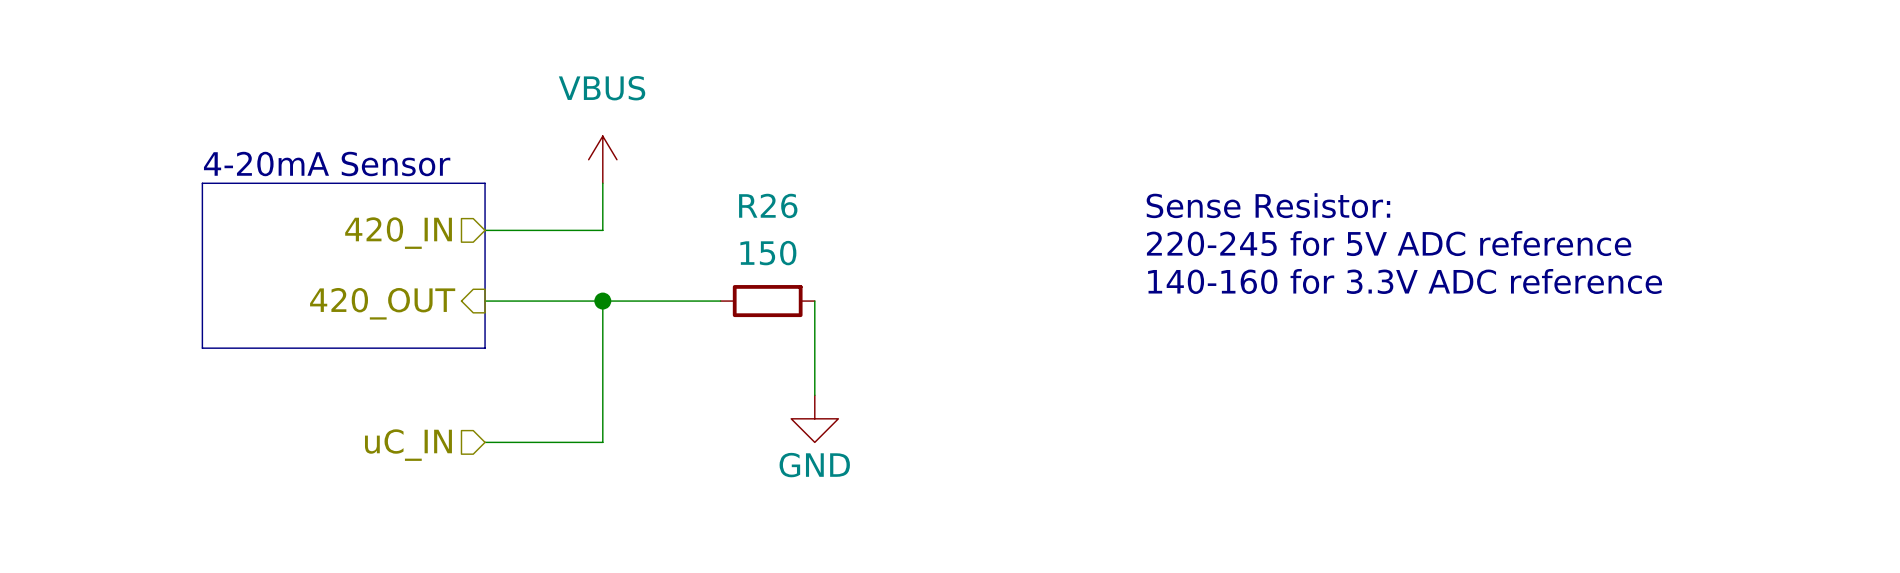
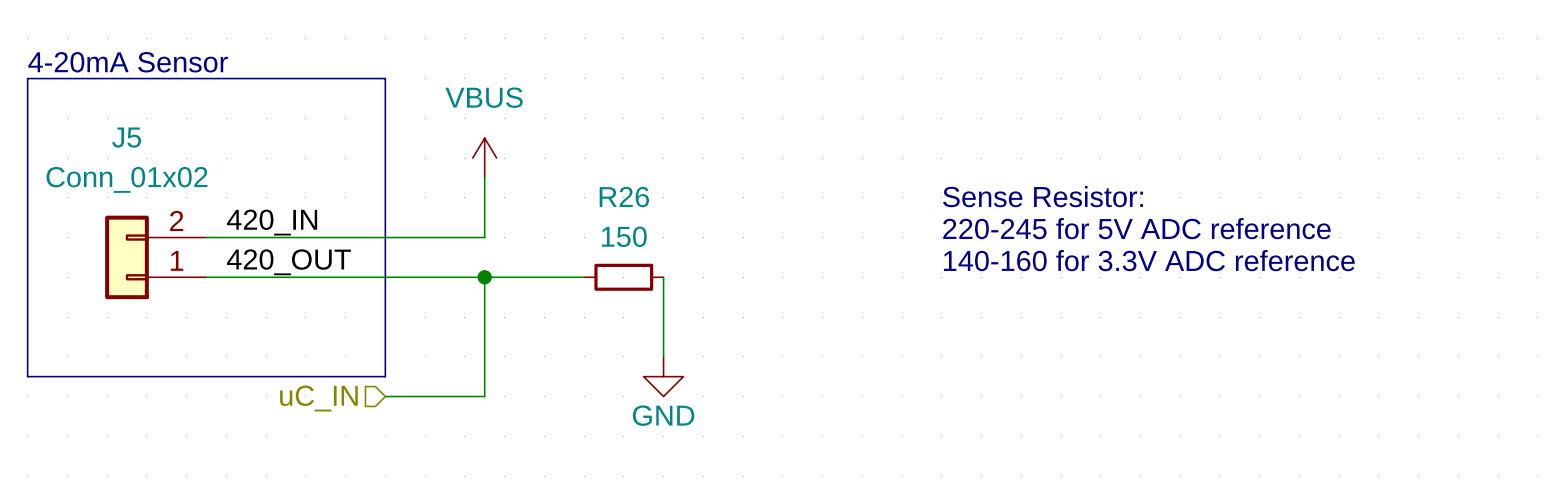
text position: 4-20mA Sensor (327, 164) -> 4-20mA Sensor (128, 62)
line: (485, 183) (202, 183) (202, 348) (485, 348) -> (385, 177) (385, 78) (27, 78) (27, 376) (385, 376) (385, 317)
wire: (485, 230) (602, 230) -> (206, 237) (484, 237) (484, 217)
hierarchical label: 420_IN (398, 233) -> none
label: none -> 420_IN (272, 222)
J5: none -> Conn_01x02 (155, 257)
label: none -> 420_OUT (288, 262)
wire: none -> (206, 277) (385, 277)
hierarchical label: 420_OUT (382, 303) -> none

